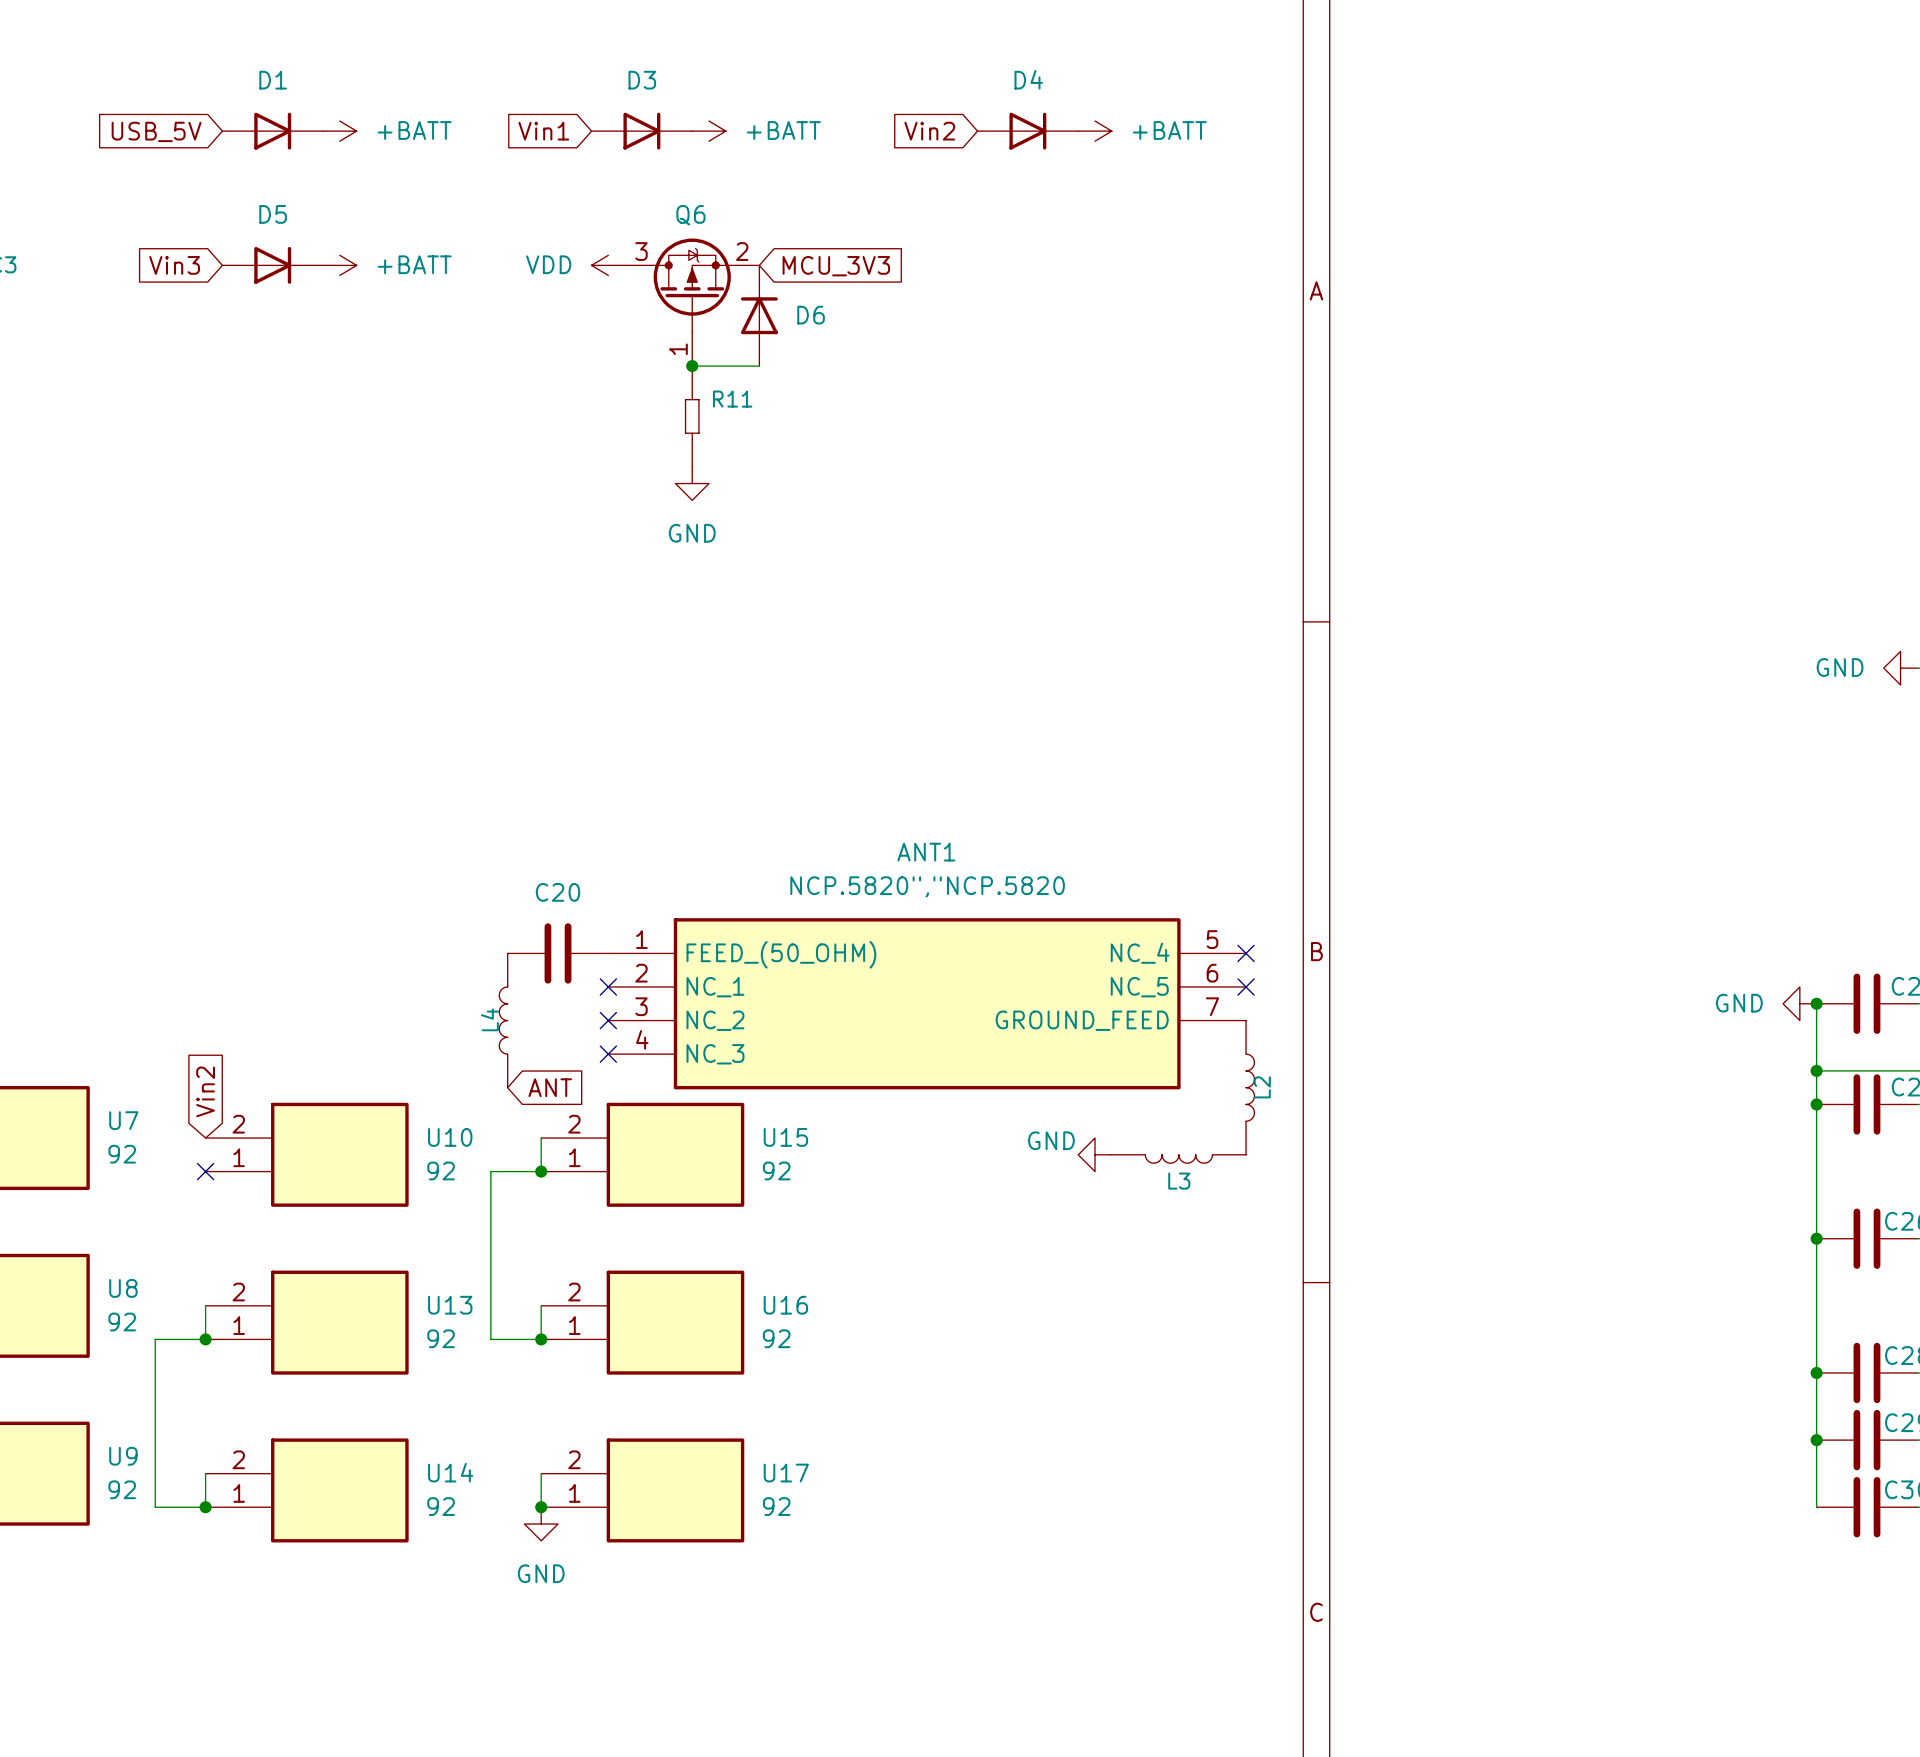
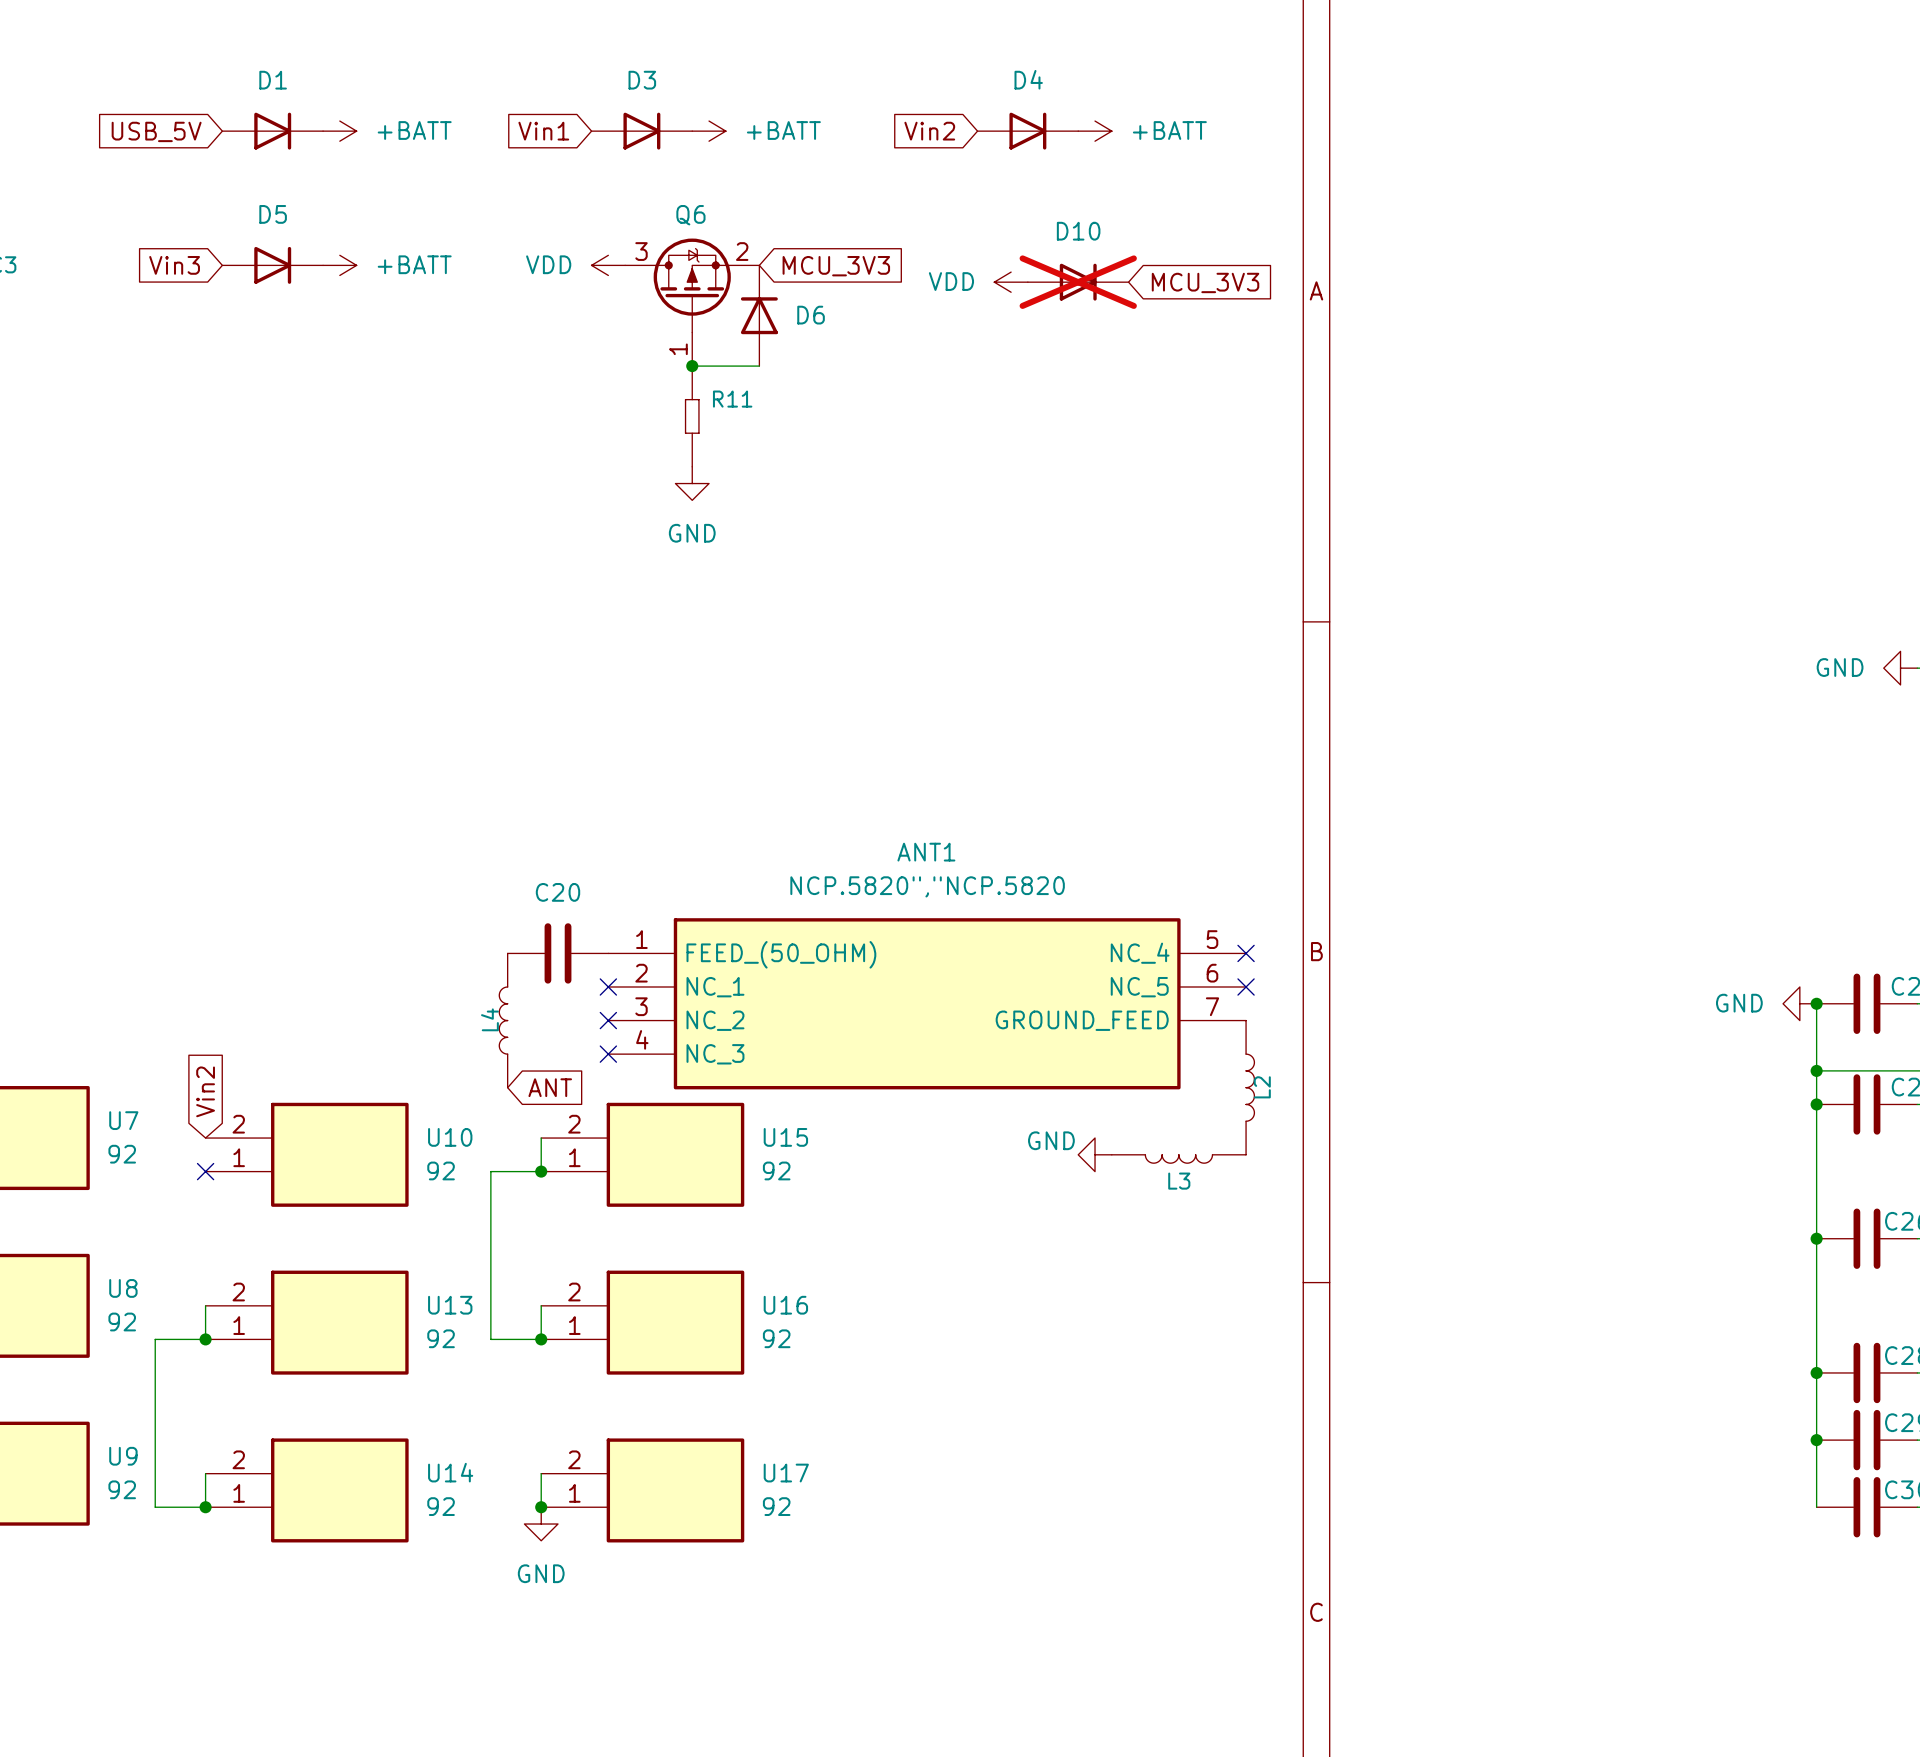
power symbol: none -> VDD (1011, 282)
D10: none -> (1078, 282)
global label: none -> MCU_3V3 (1205, 282)

